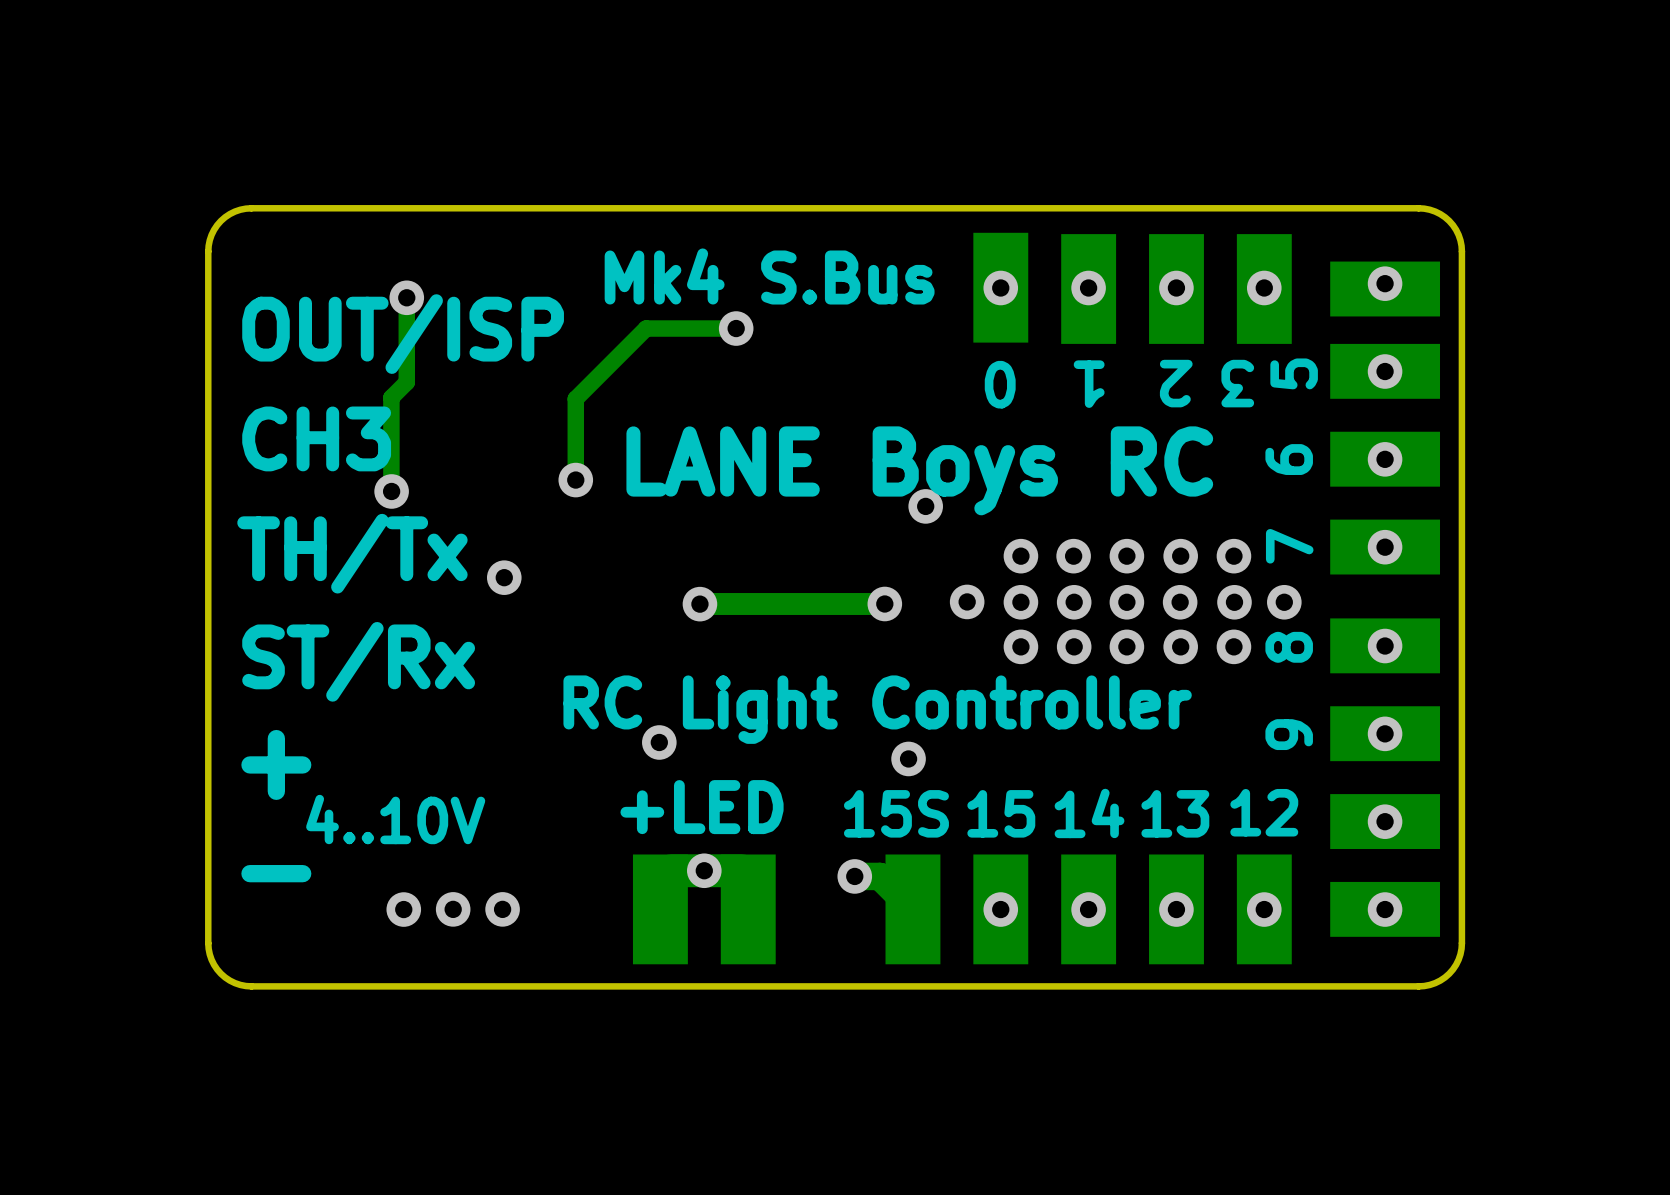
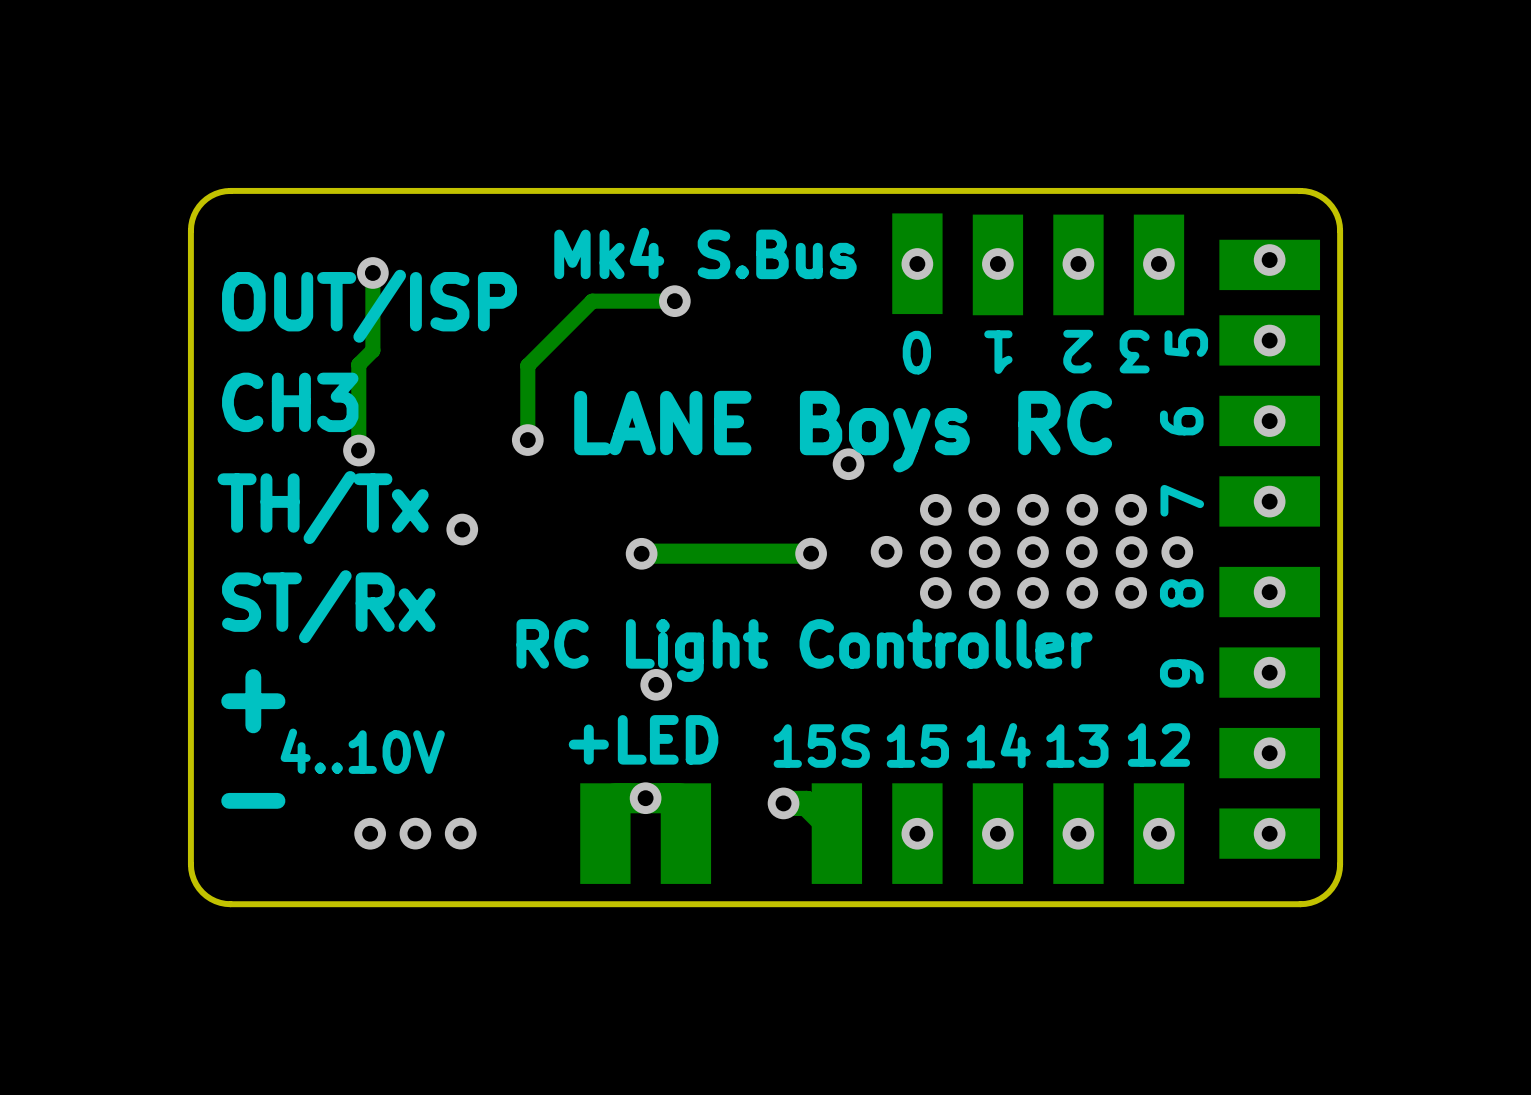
via position: (659, 742) -> (656, 684)
via: (908, 758) -> none

